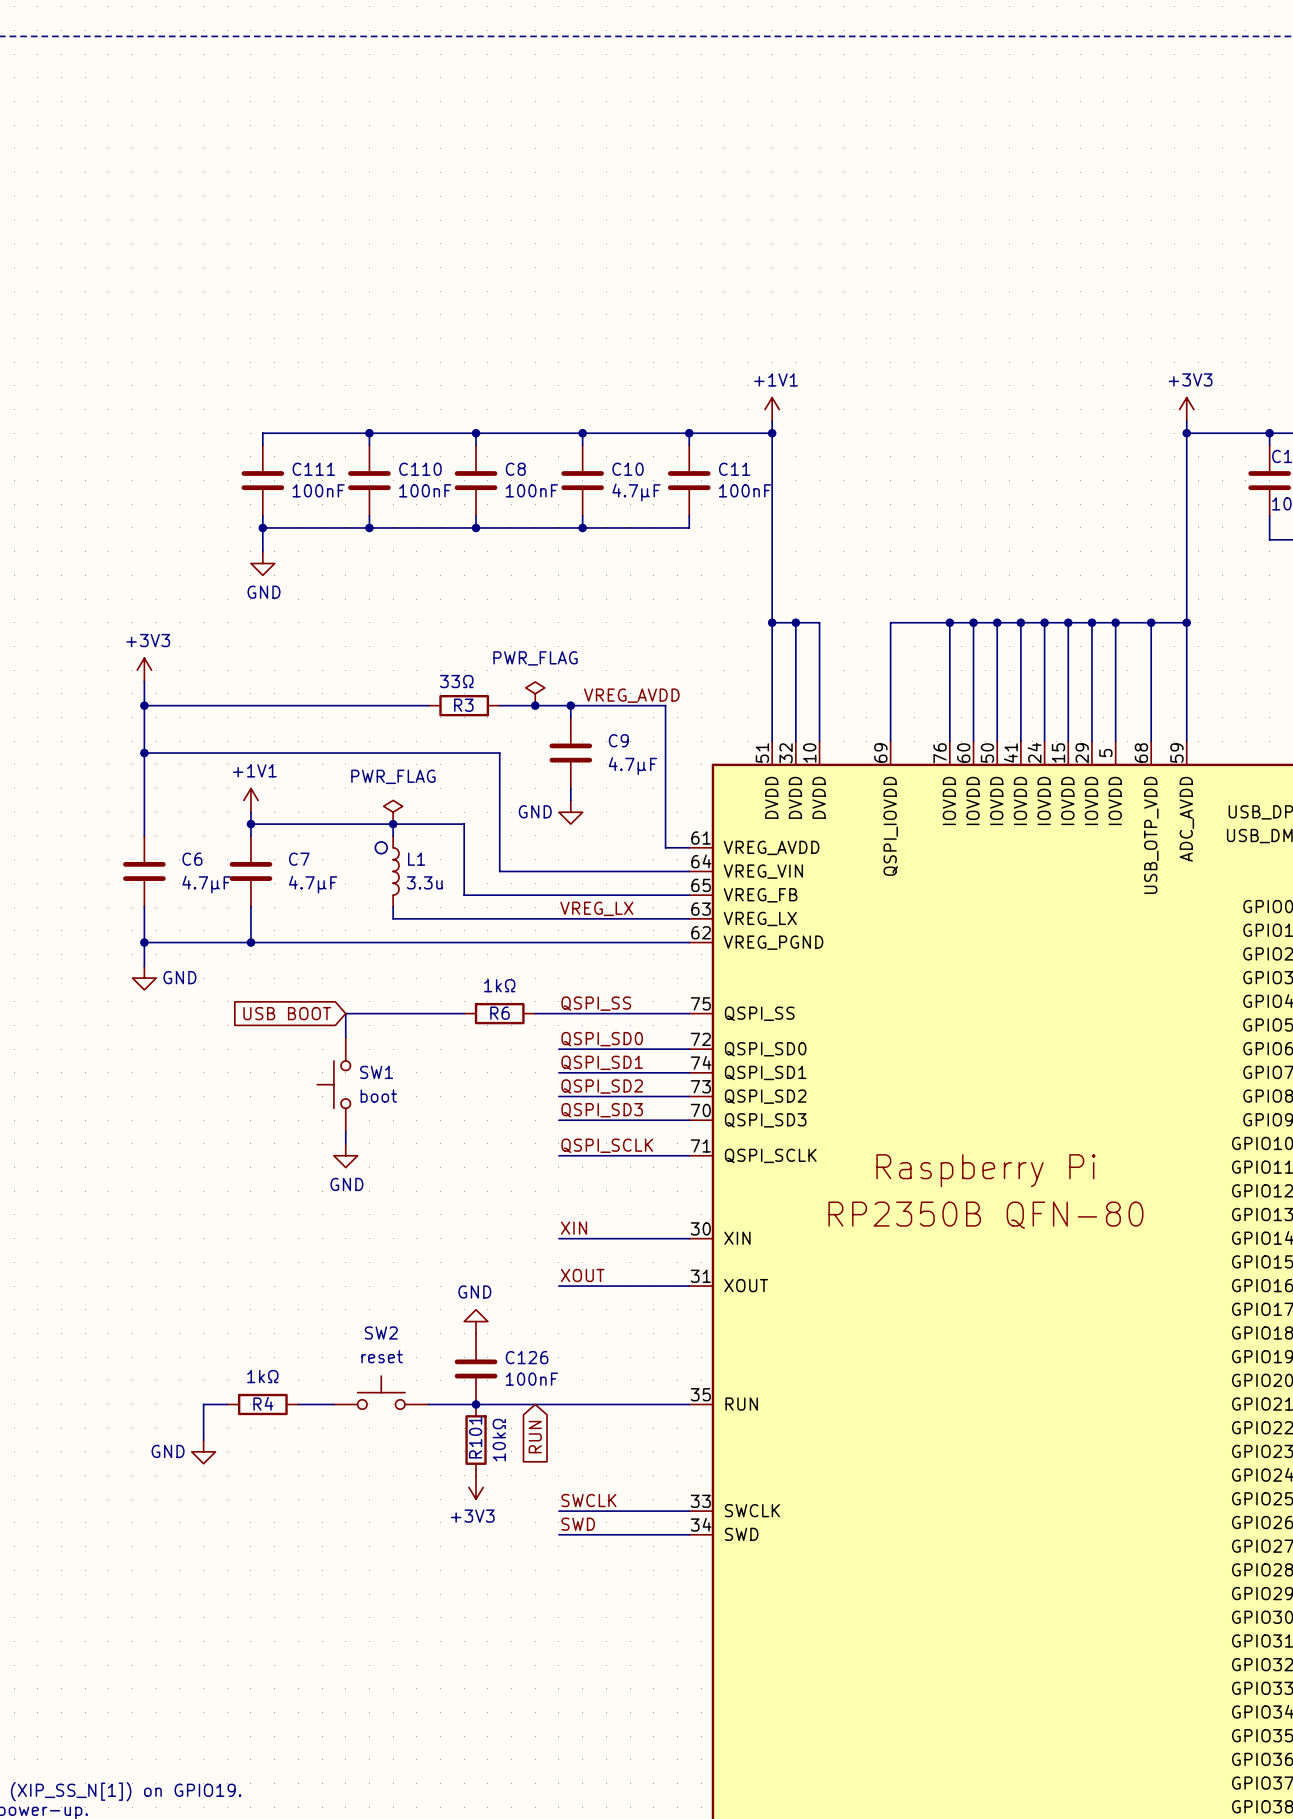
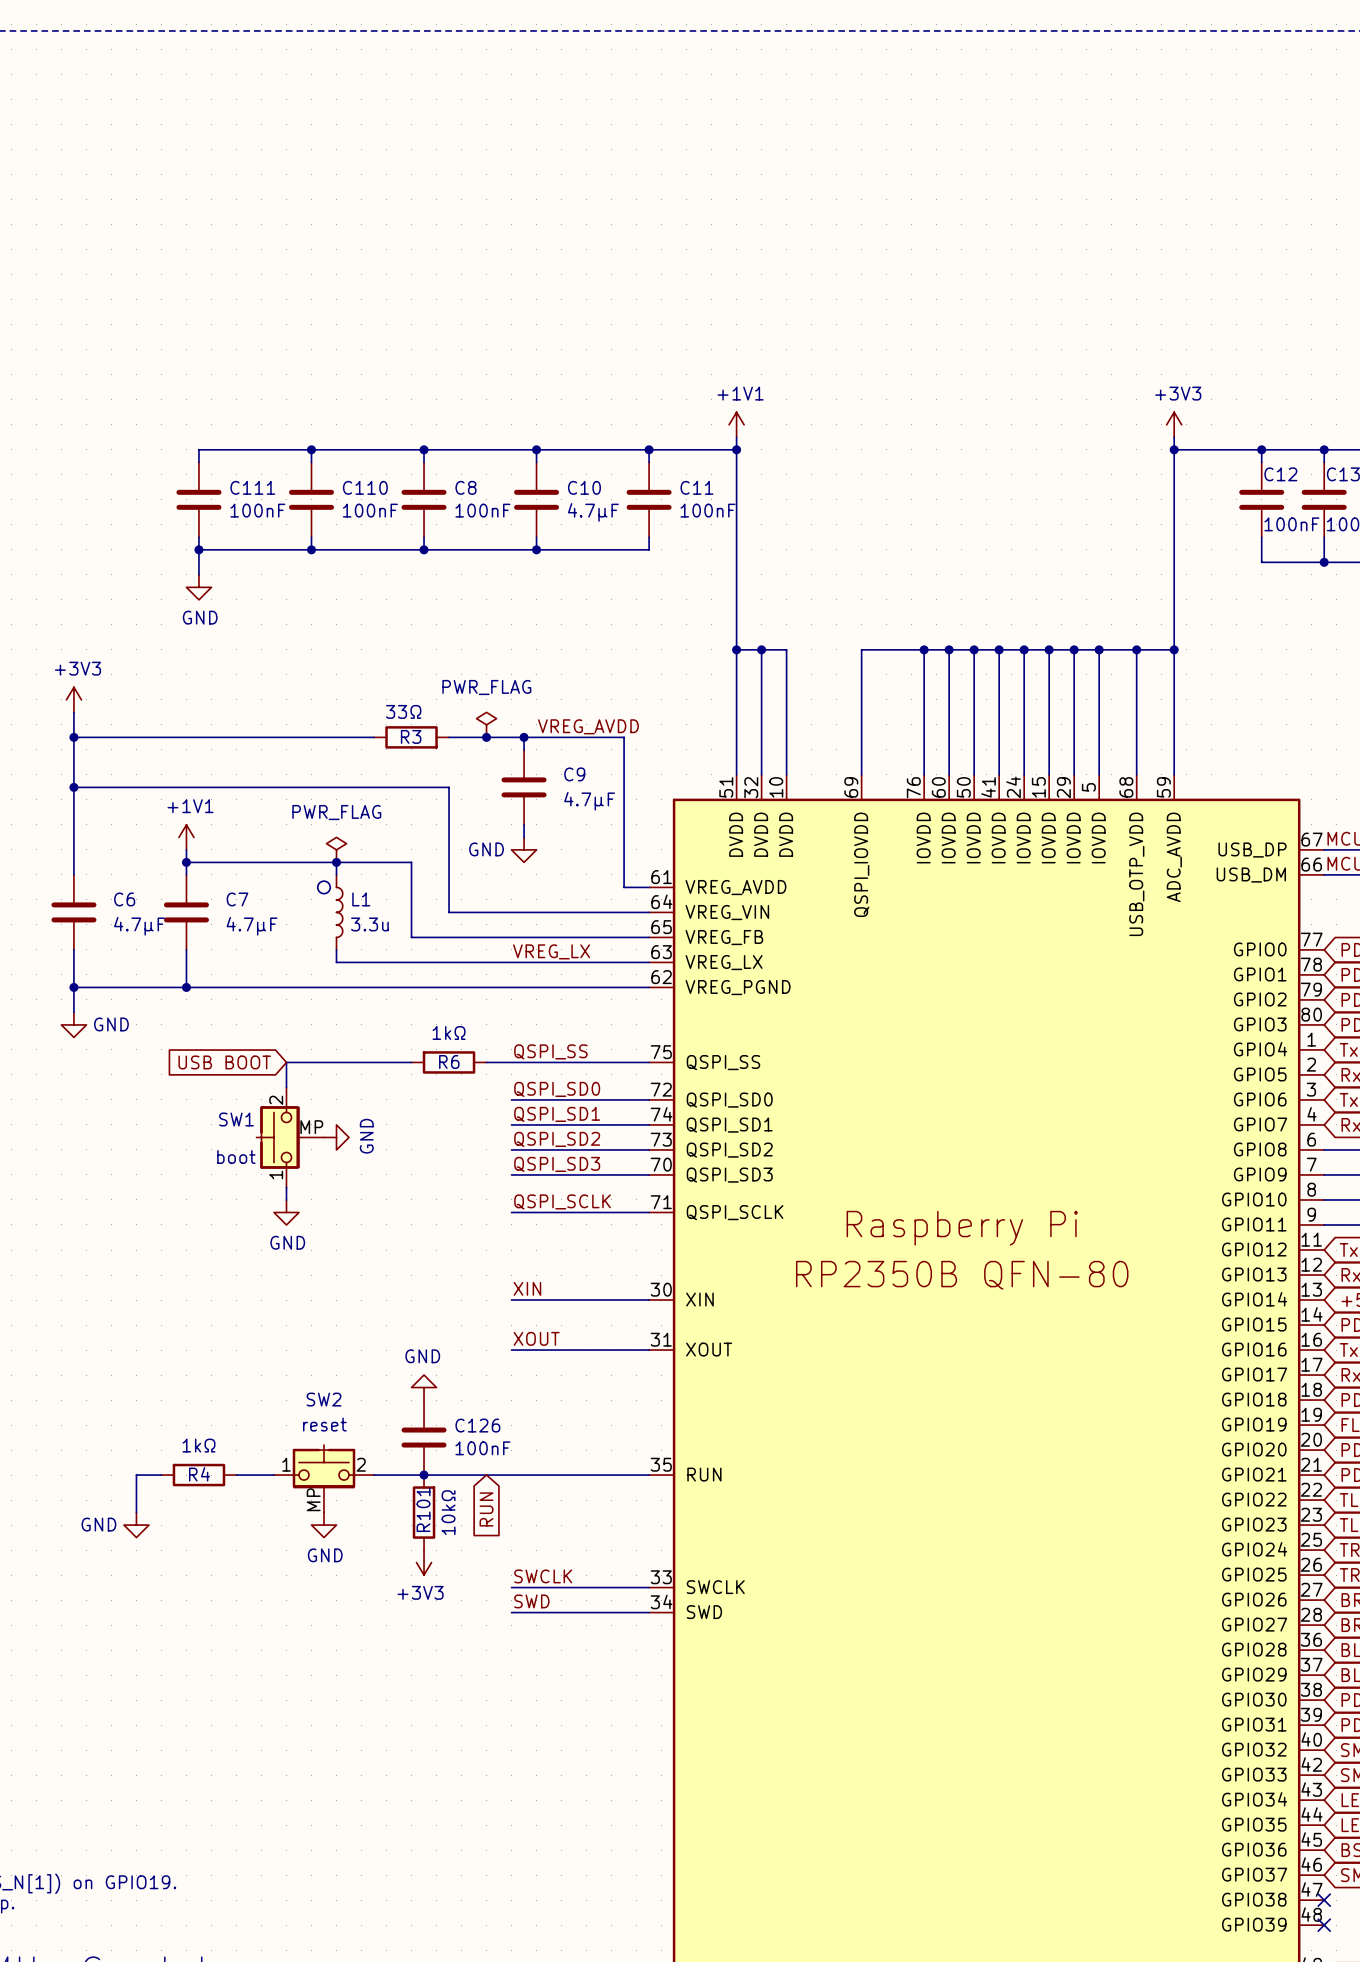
SW1 symbol: [317, 1037, 351, 1133] -> [256, 1087, 324, 1188]
SW1 name position: SW1 (376, 1072) -> SW1 (236, 1119)
power symbol: none -> GND (336, 1137)
SW1 text: boot (378, 1096) -> none
SW1 value: none -> boot (236, 1157)
SW2 symbol: [333, 1376, 429, 1410] -> [273, 1445, 375, 1513]
power symbol: none -> GND (323, 1525)

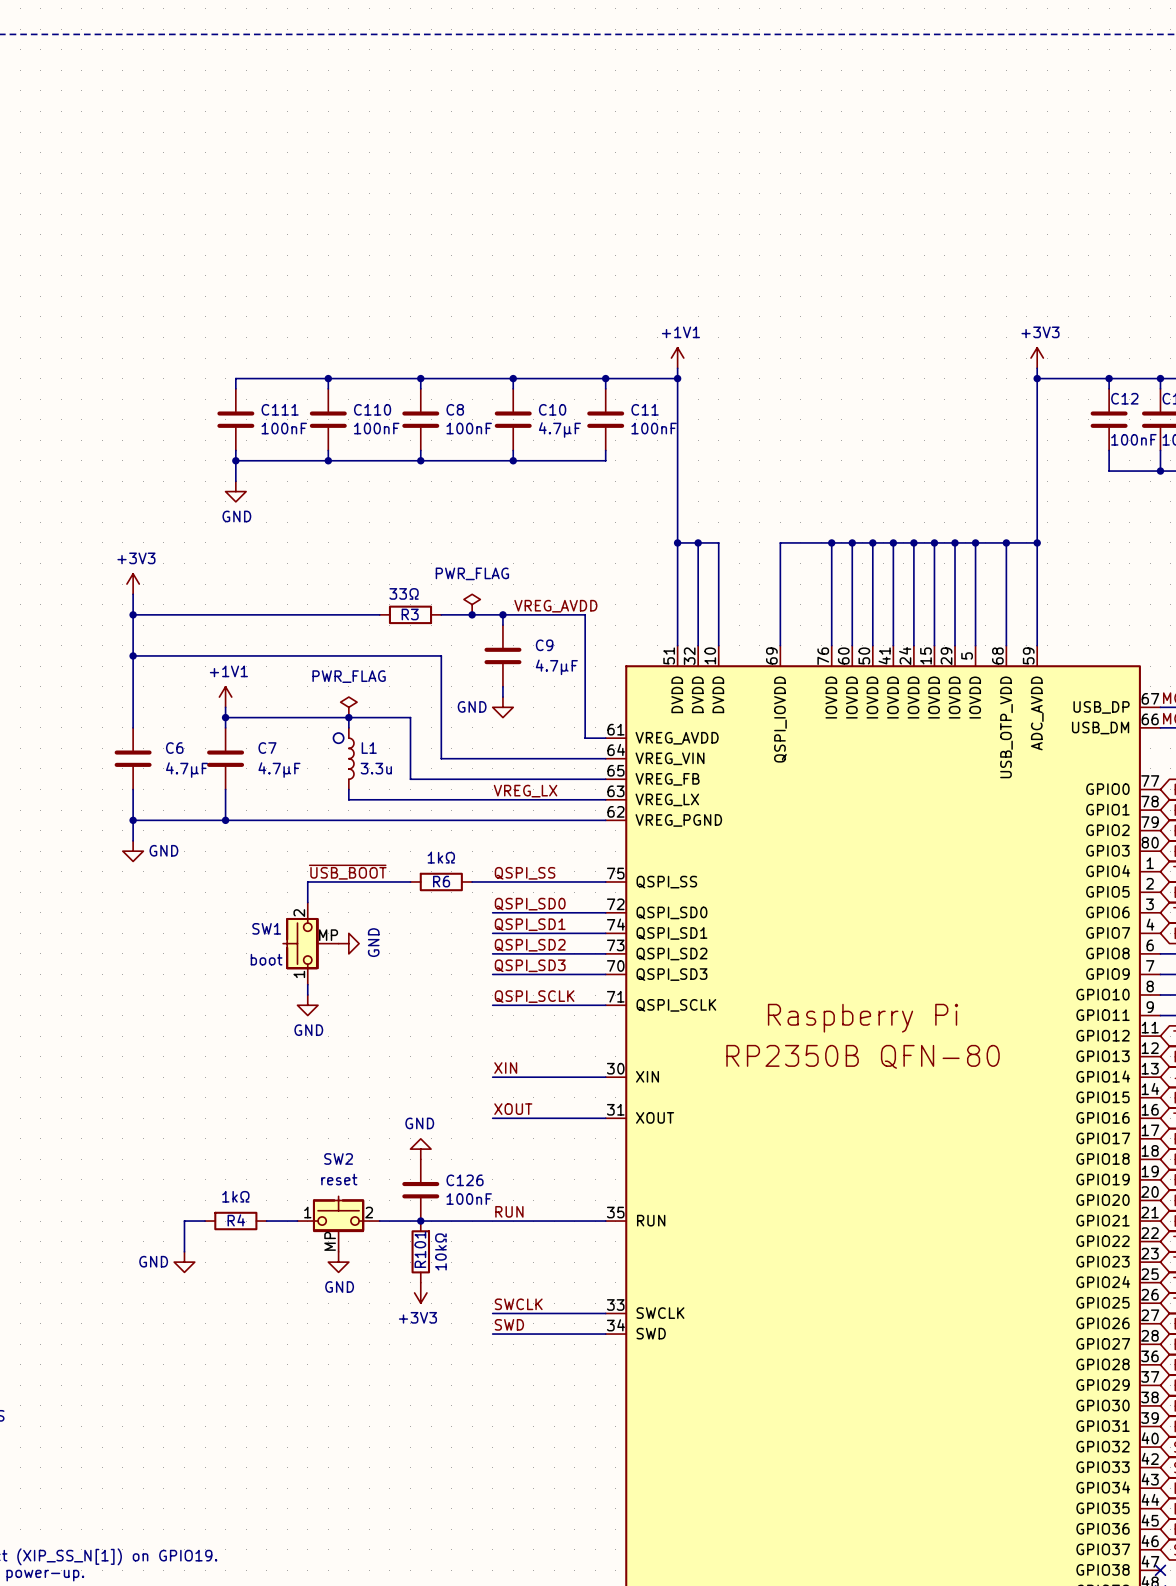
label: none -> ~{USB_BOOT} (347, 872)
global label: USB BOOT (224, 1062) -> none
label: none -> RUN (509, 1211)
global label: RUN (486, 1509) -> none

